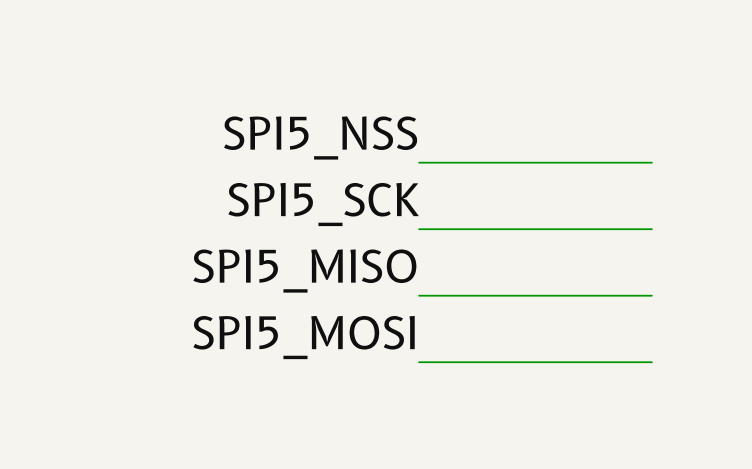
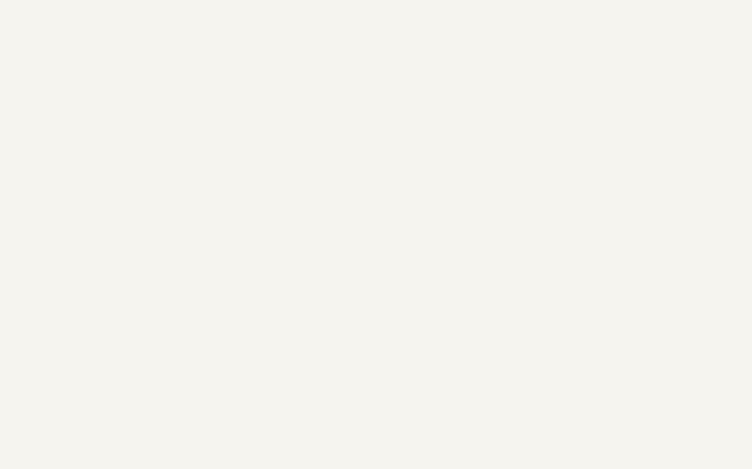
label: SPI5_NSS (320, 137) -> none
wire: (419, 162) (651, 162) -> none
label: SPI5_SCK (323, 204) -> none
wire: (419, 229) (651, 229) -> none
label: SPI5_MISO (304, 271) -> none
wire: (419, 295) (651, 295) -> none
label: SPI5_MOSI (304, 337) -> none
wire: (419, 362) (651, 362) -> none

